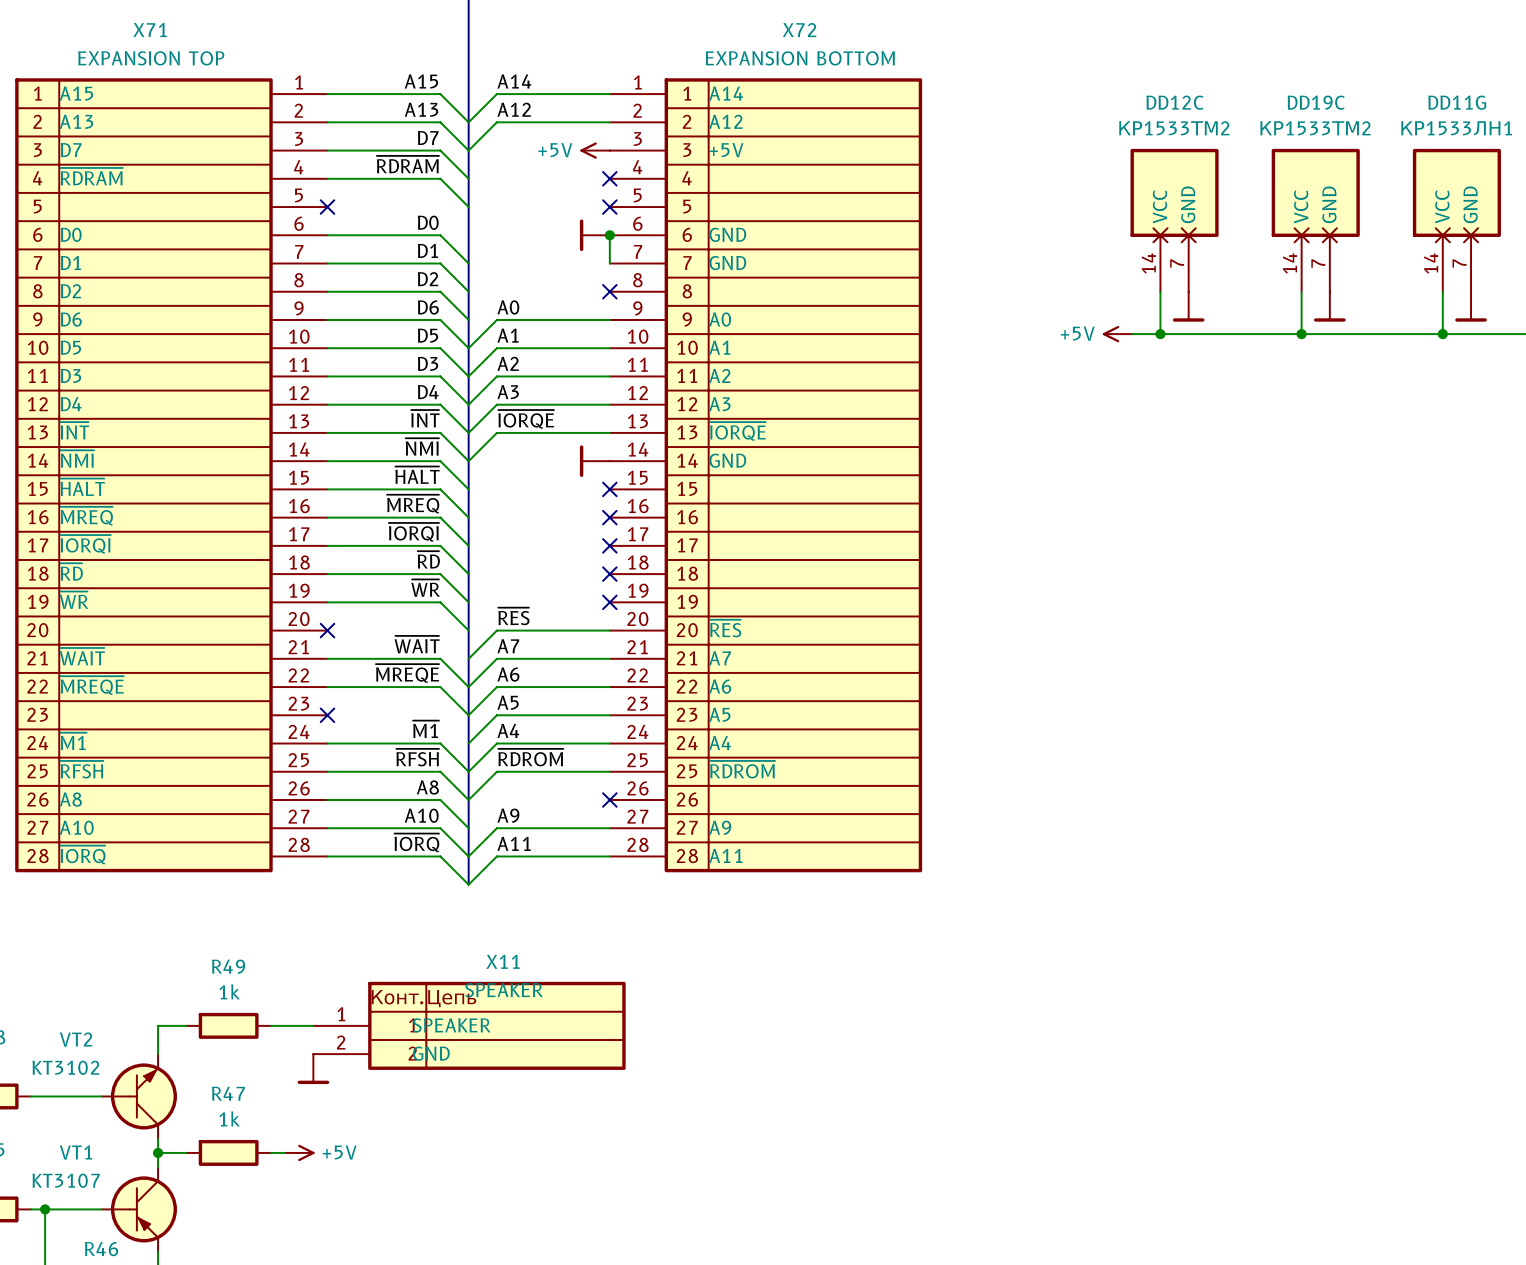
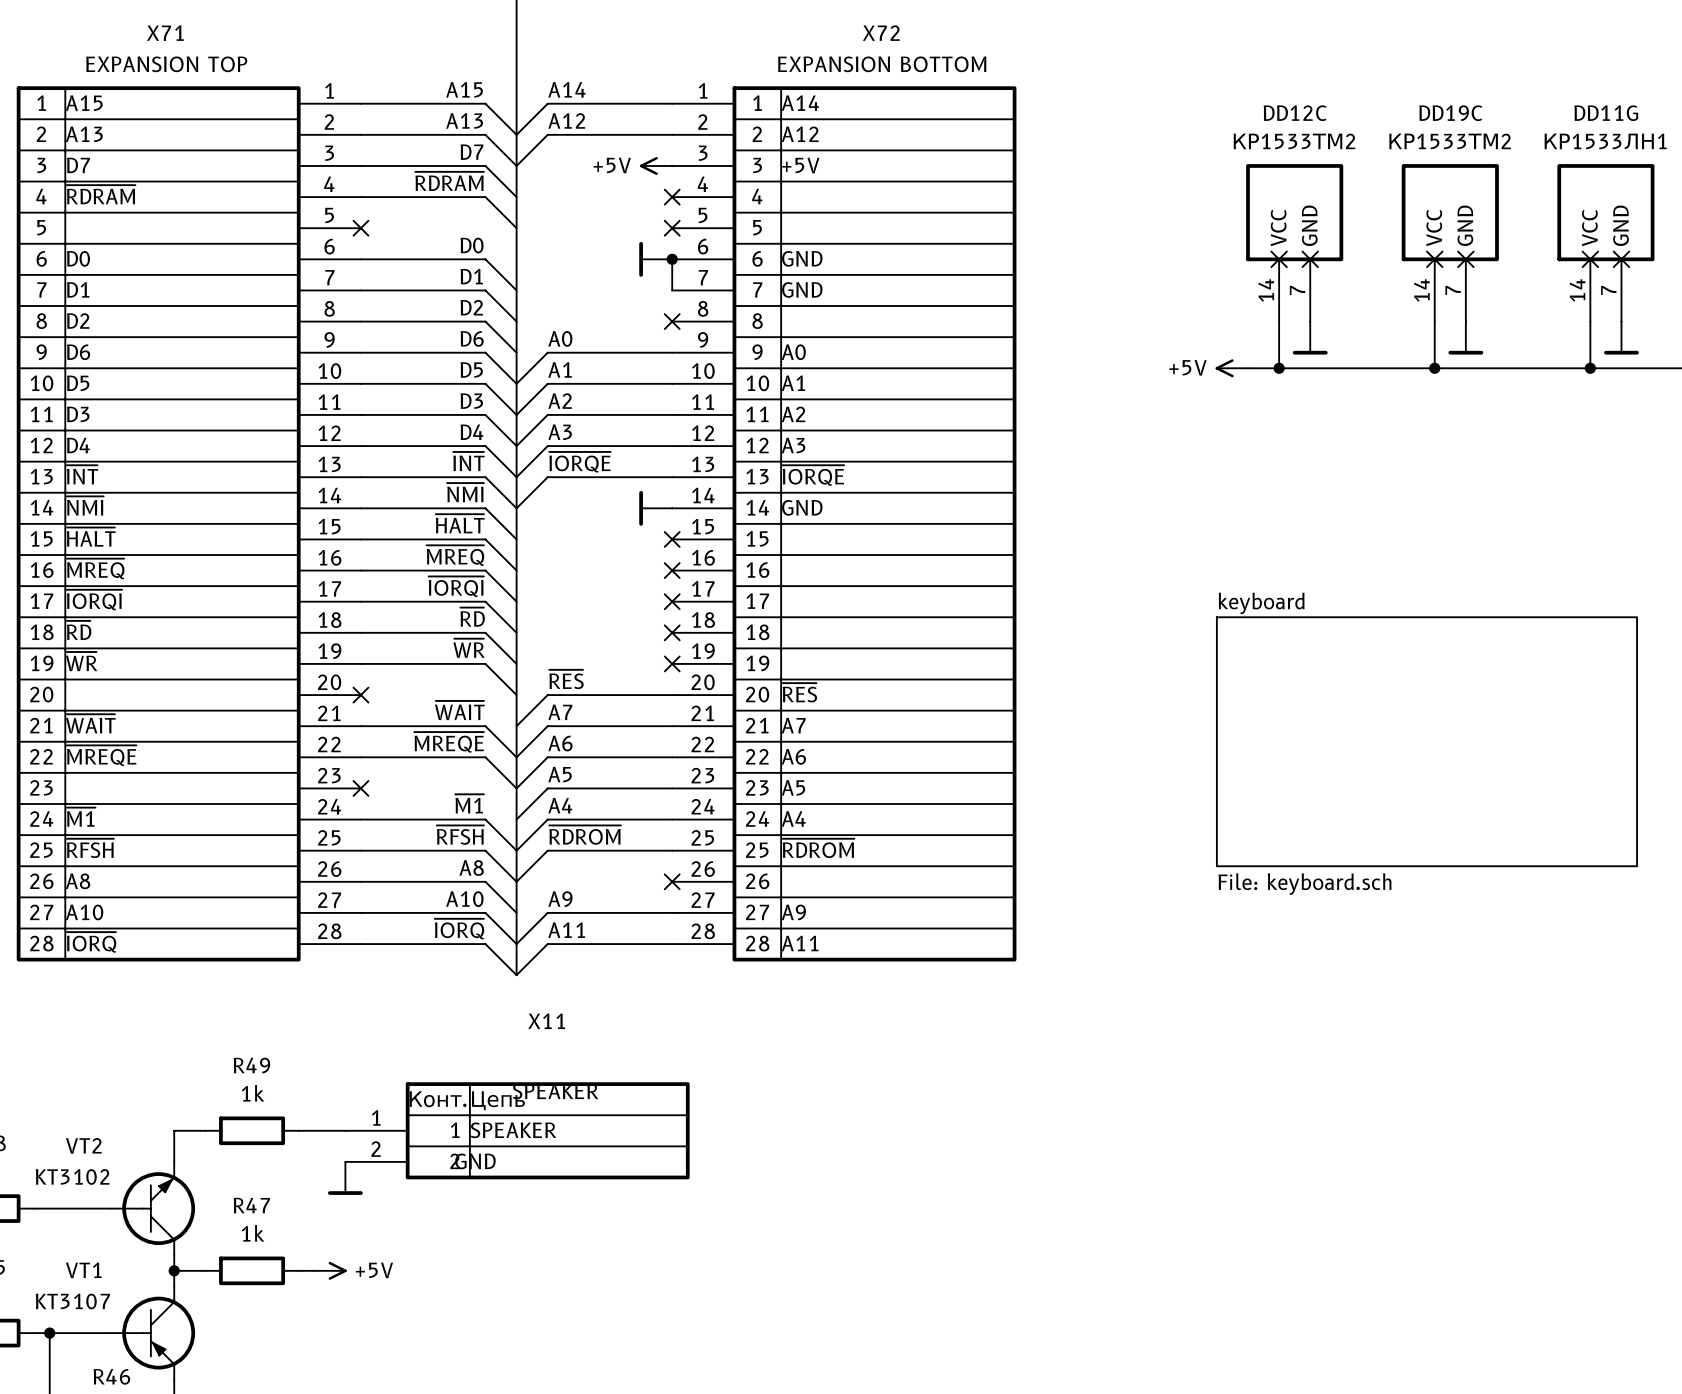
sheet keyboard: none -> File: keyboard.sch (1426, 741)
X11 name position: X11 (503, 961) -> X11 (546, 1021)
X11 text position: SPEAKER (451, 1025) -> SPEAKER (513, 1130)

